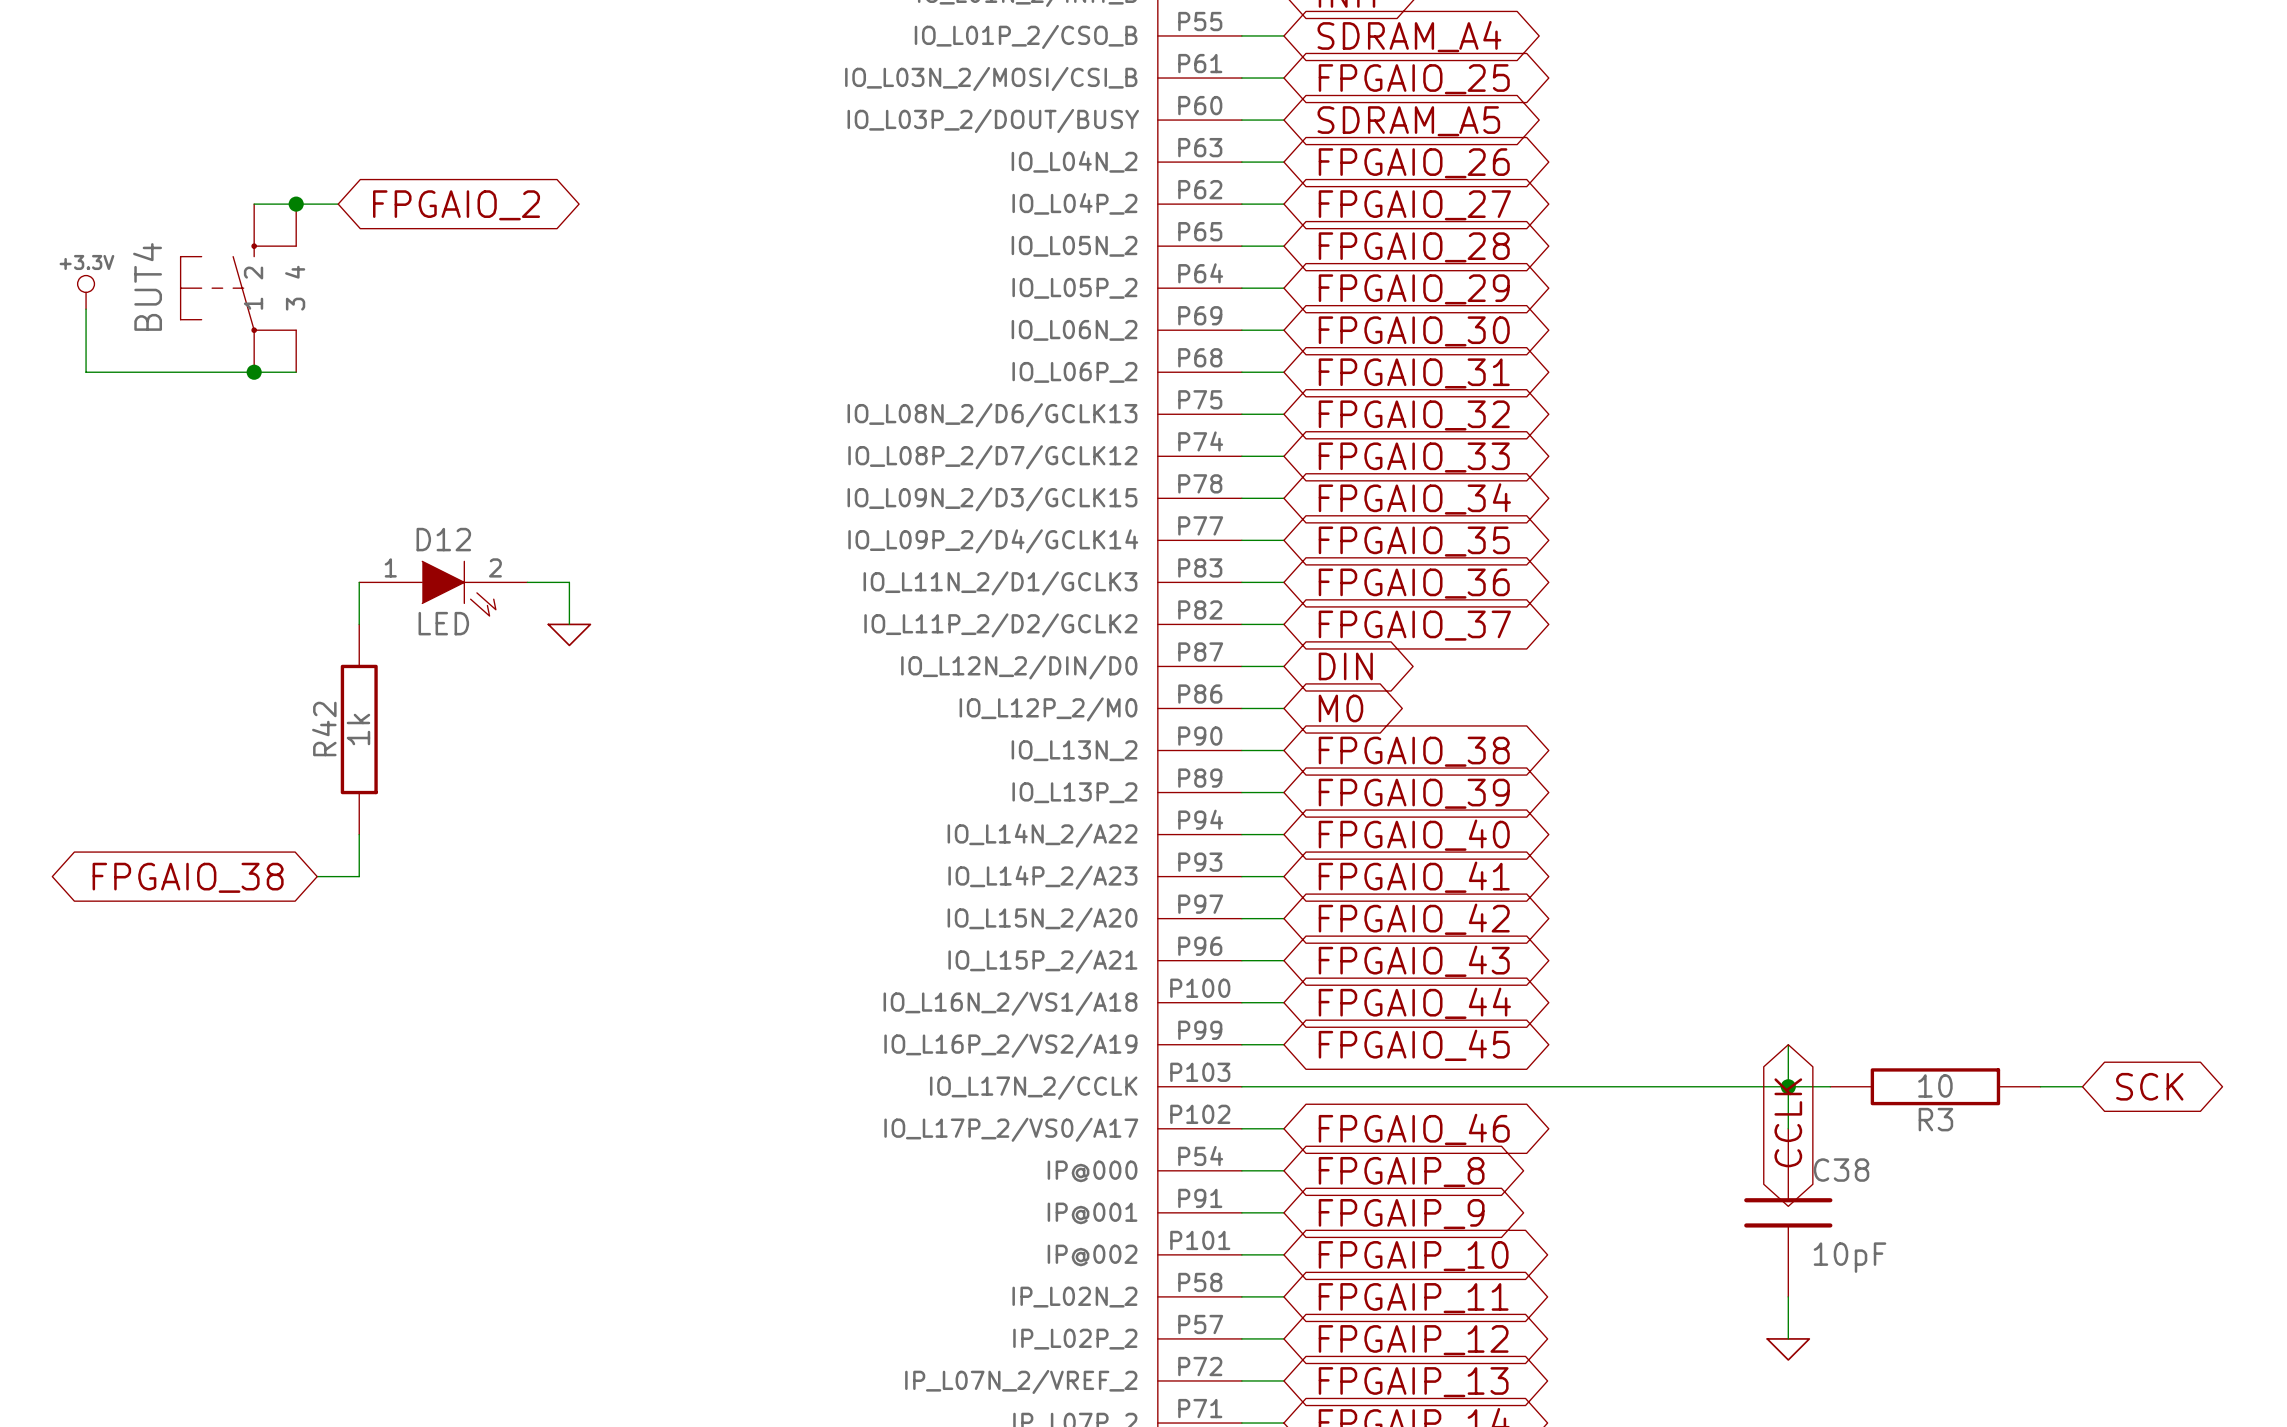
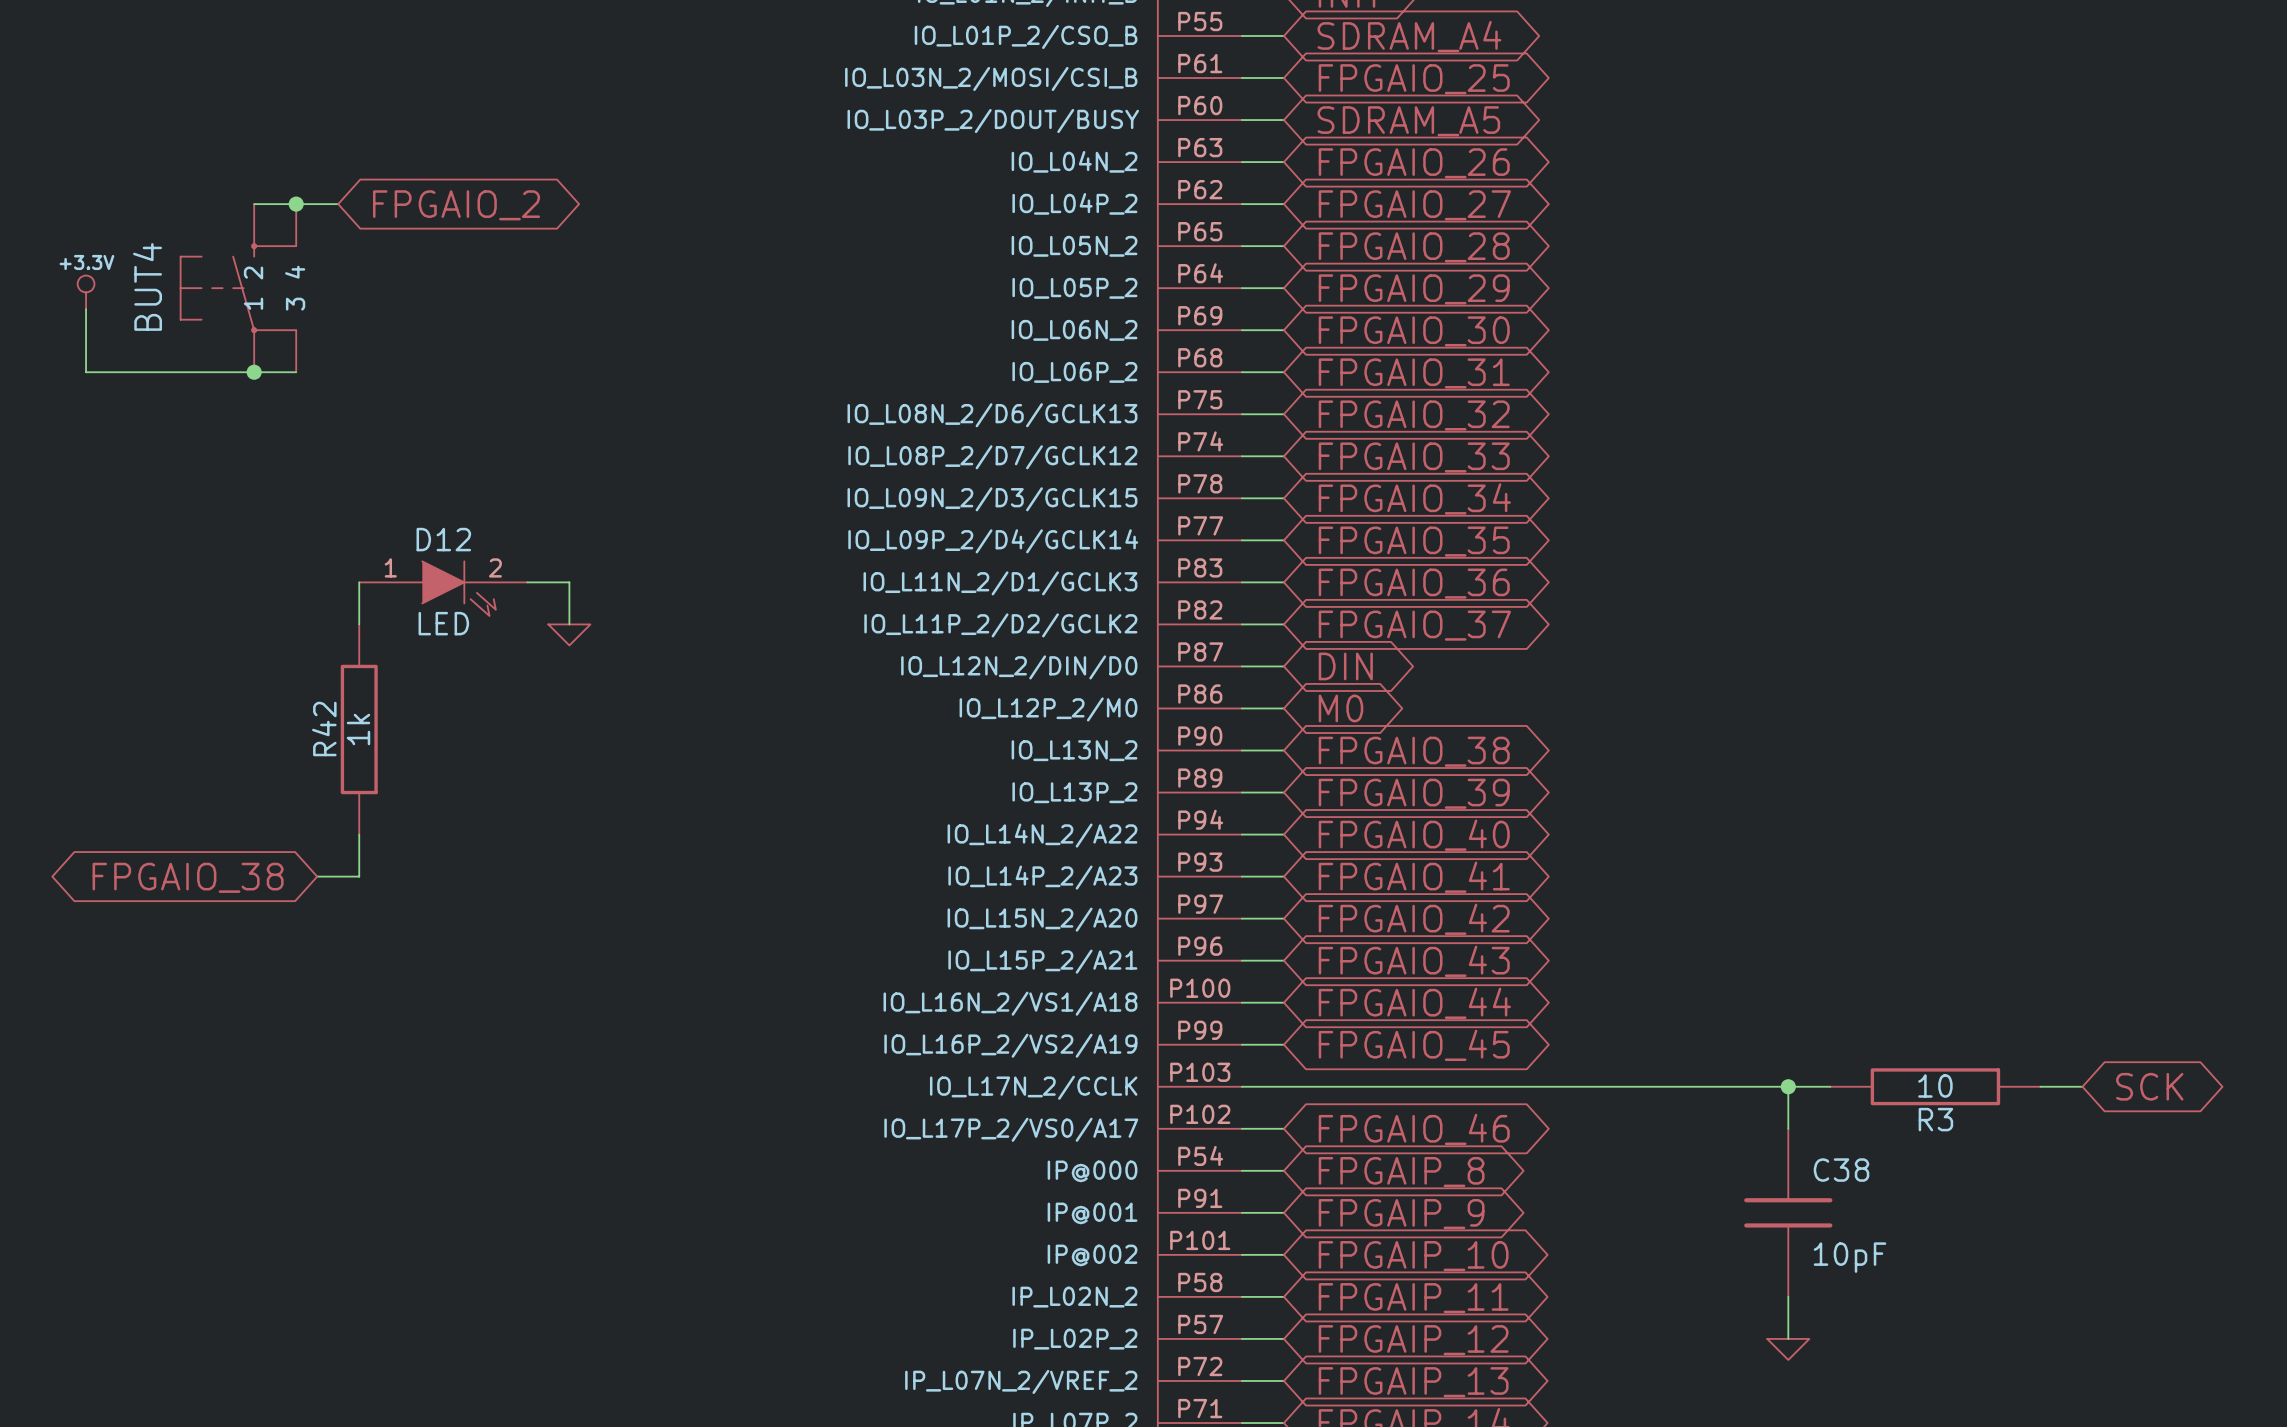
wire: (1788, 1044) (1788, 1086) -> none
global label: CCLK (1788, 1122) -> none

